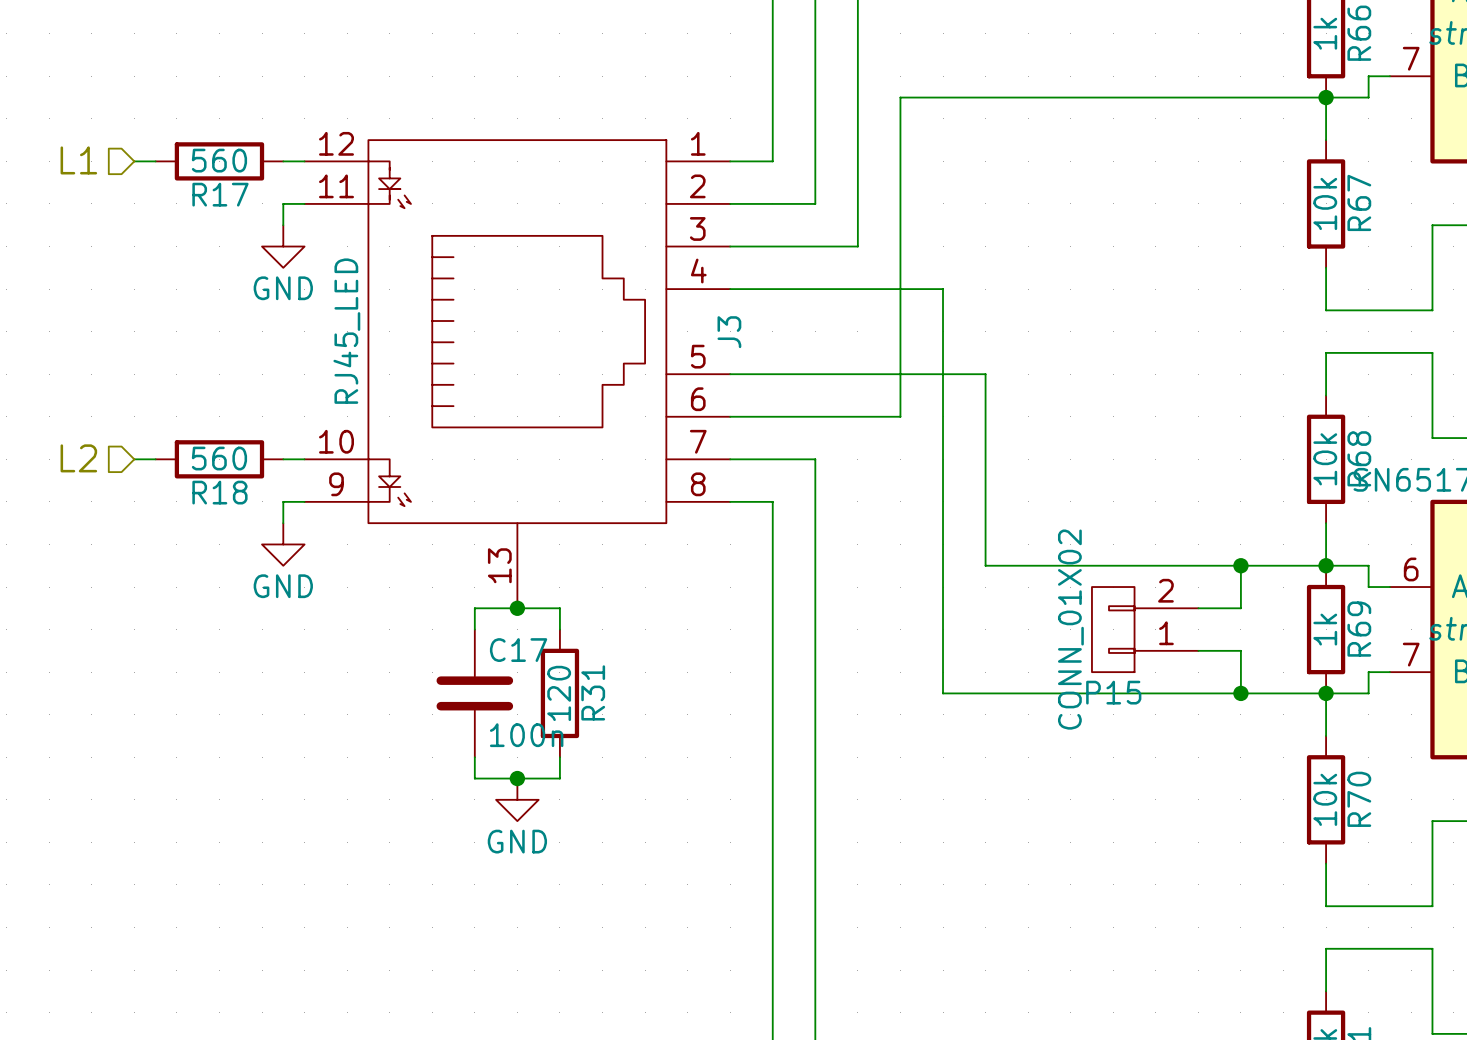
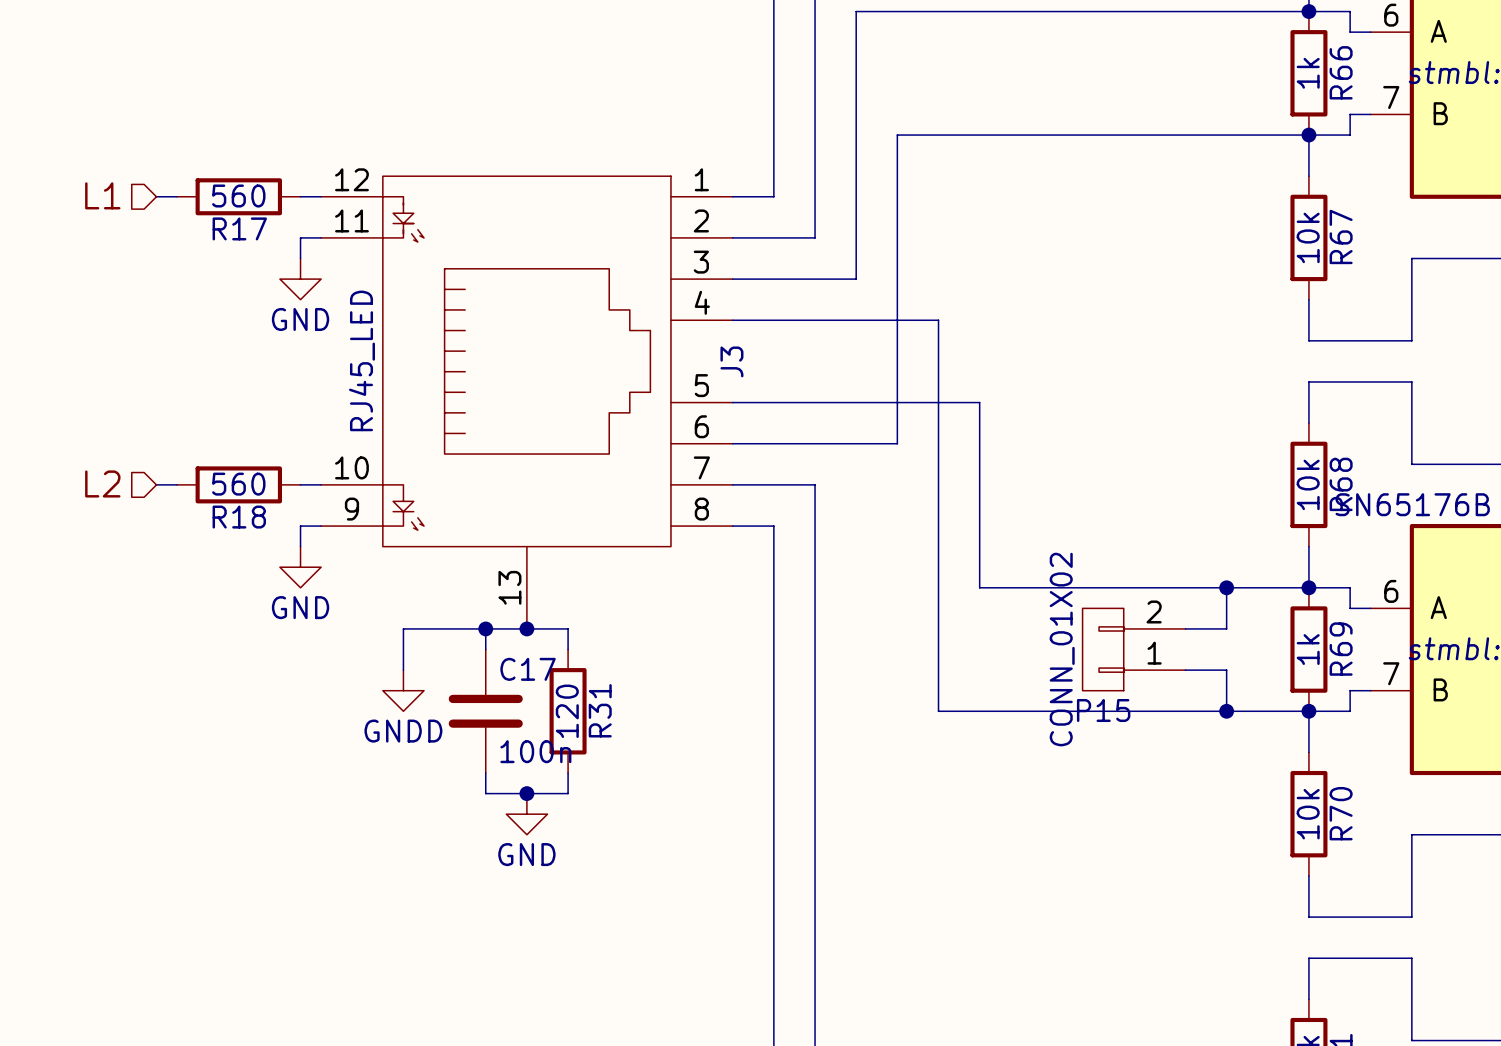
wire: none -> (485, 628) (403, 628) (403, 670)
junction: none -> (485, 628)
power symbol: none -> GNDD (403, 690)

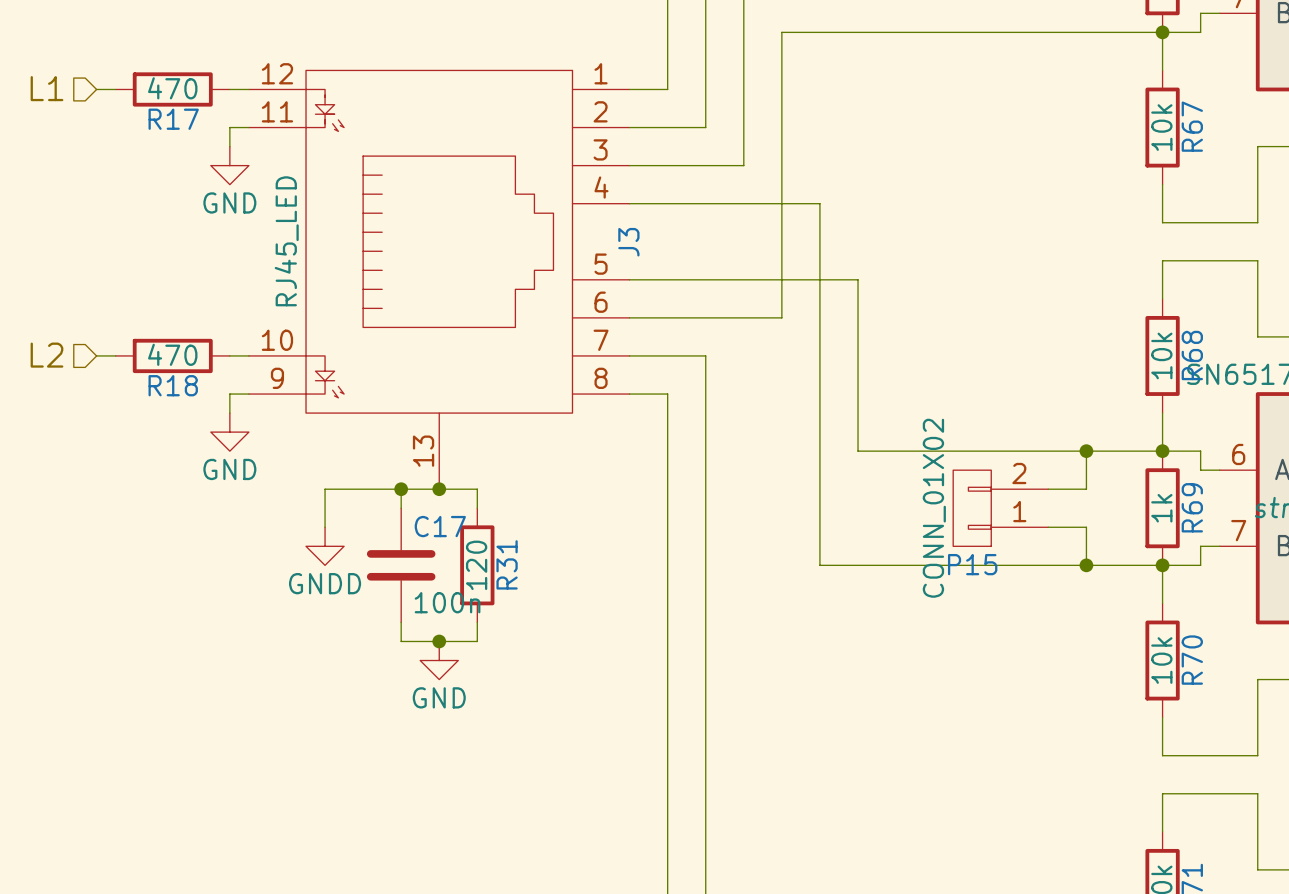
R17 value: 560 (238, 196) -> 470 (172, 88)
R18 value: 560 (238, 484) -> 470 (172, 354)

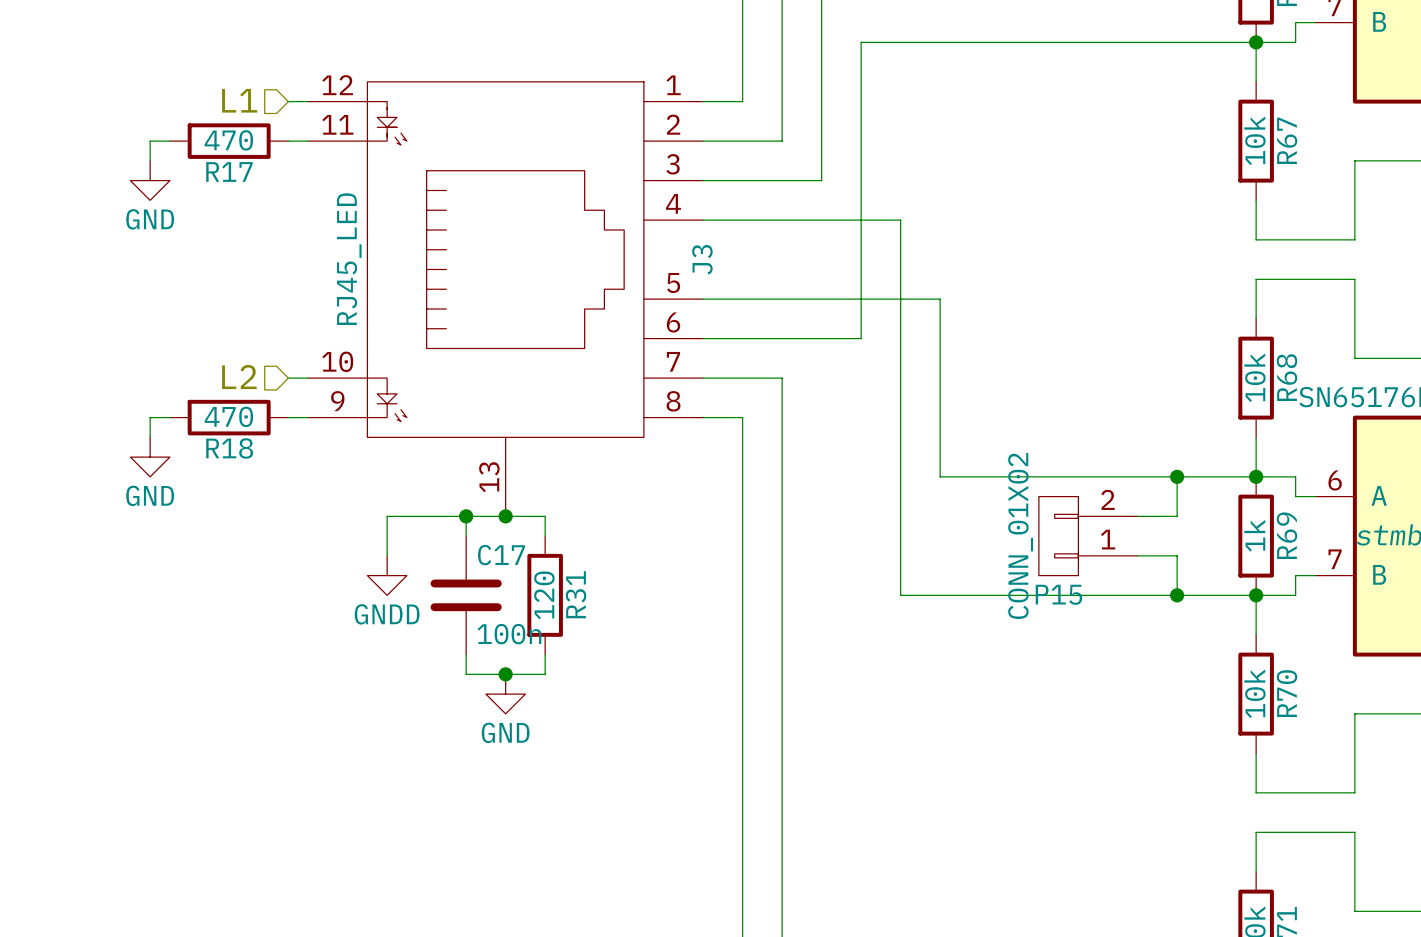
hierarchical label position: L1 (46, 88) -> L1 (239, 100)
wire: (96, 89) (115, 89) -> none
R17 position: (172, 89) -> (229, 141)
wire: none -> (169, 141) (150, 141) (150, 160)
wire: (229, 127) (229, 146) -> none
power symbol position: GND (229, 165) -> GND (150, 180)
hierarchical label position: L2 (46, 355) -> L2 (239, 377)
wire: (96, 355) (115, 355) -> none
R18 position: (172, 355) -> (229, 417)
wire: none -> (169, 417) (150, 417) (150, 437)
wire: (229, 394) (229, 413) -> none
power symbol position: GND (229, 432) -> GND (150, 457)

